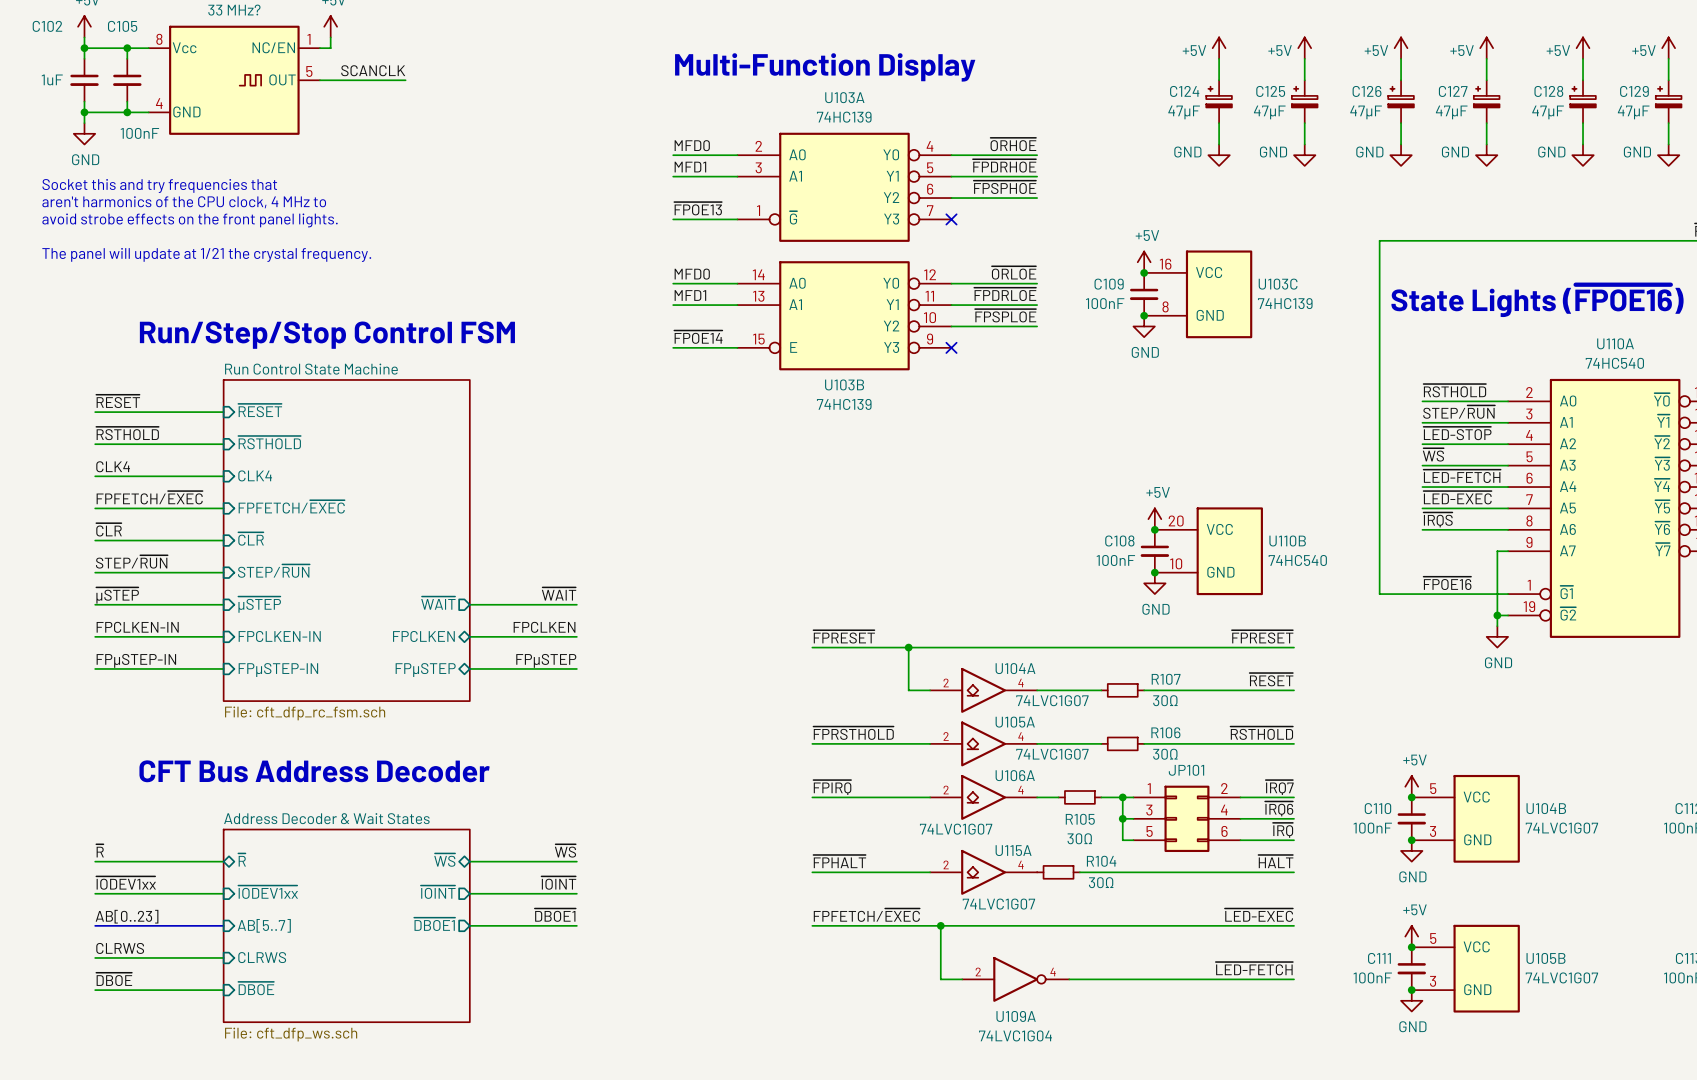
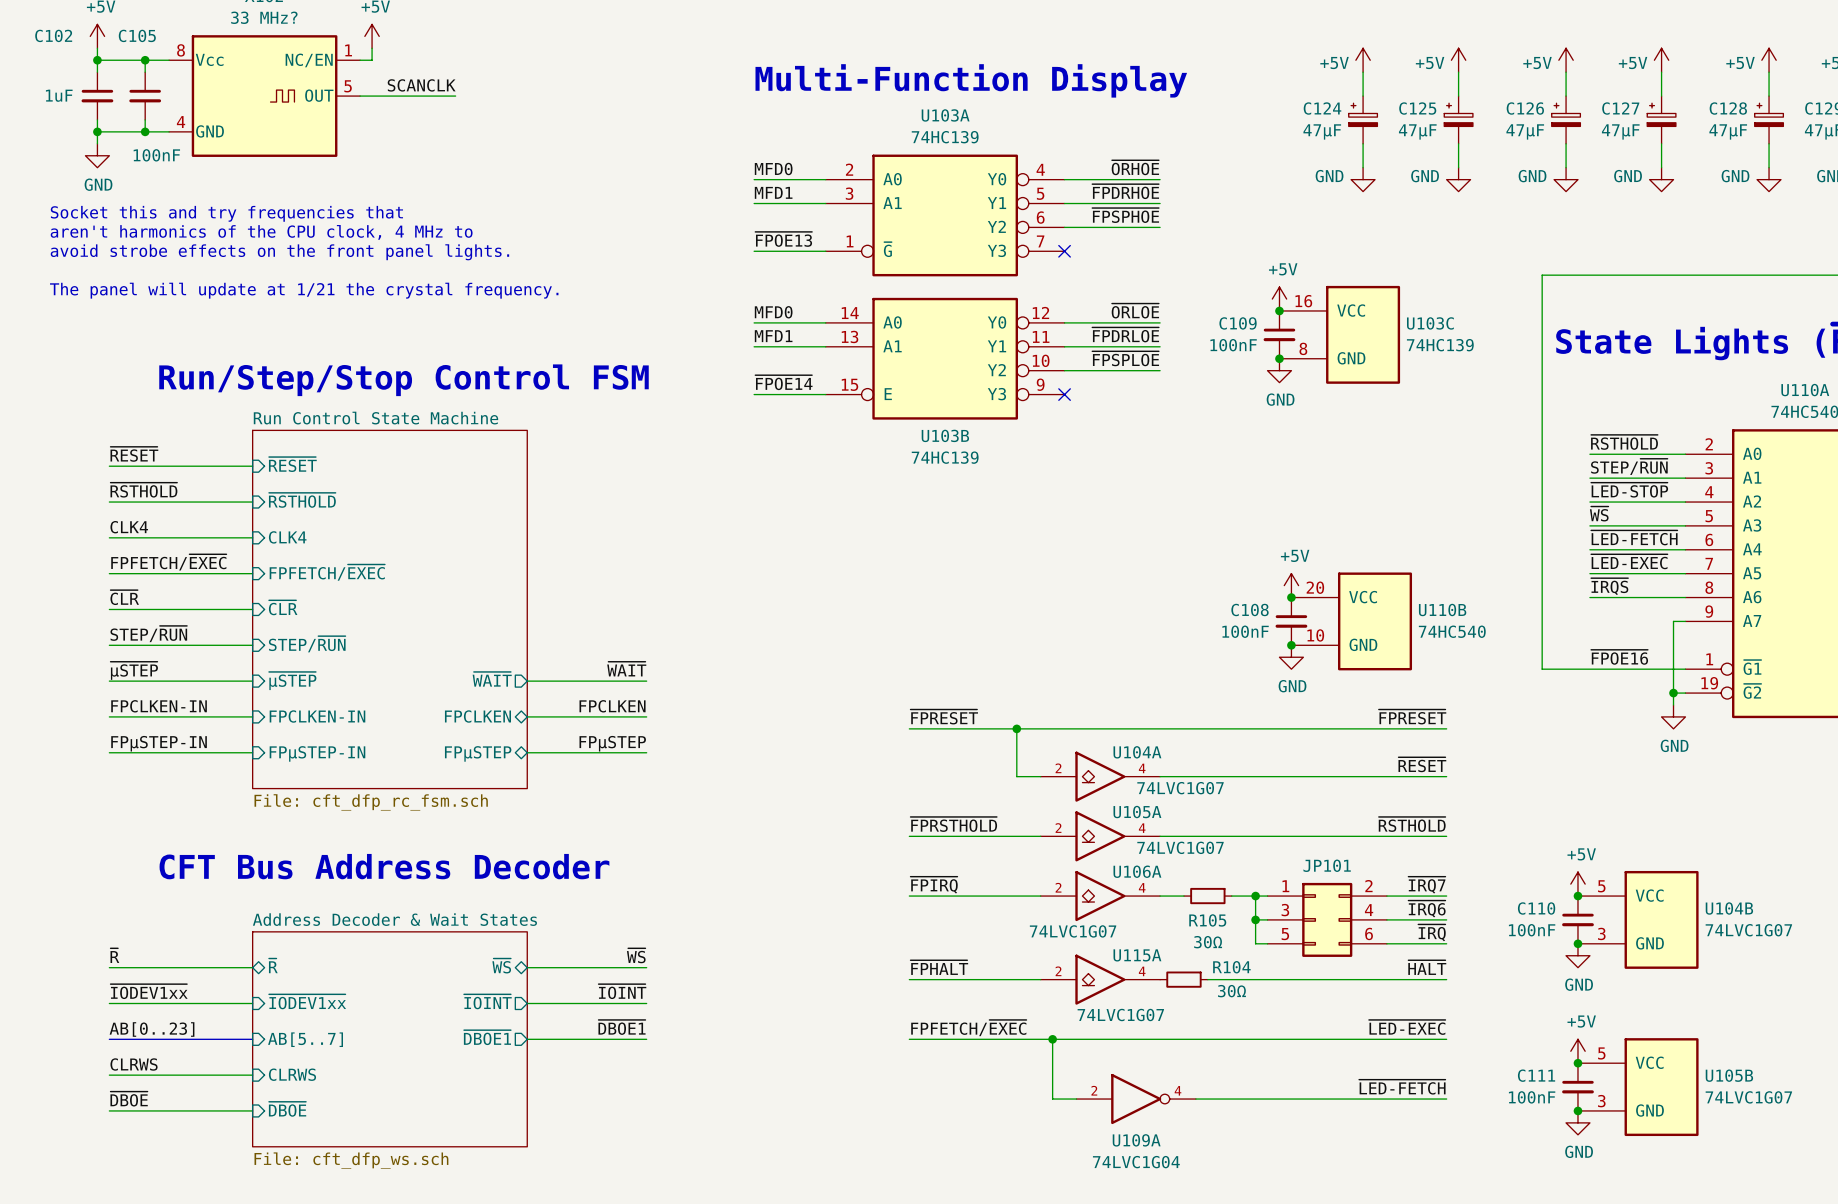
wire: none -> (1231, 776) (1279, 776)
R107: 30Ω (1122, 690) -> none
wire: none -> (1231, 836) (1279, 836)
R106: 30Ω (1122, 743) -> none

